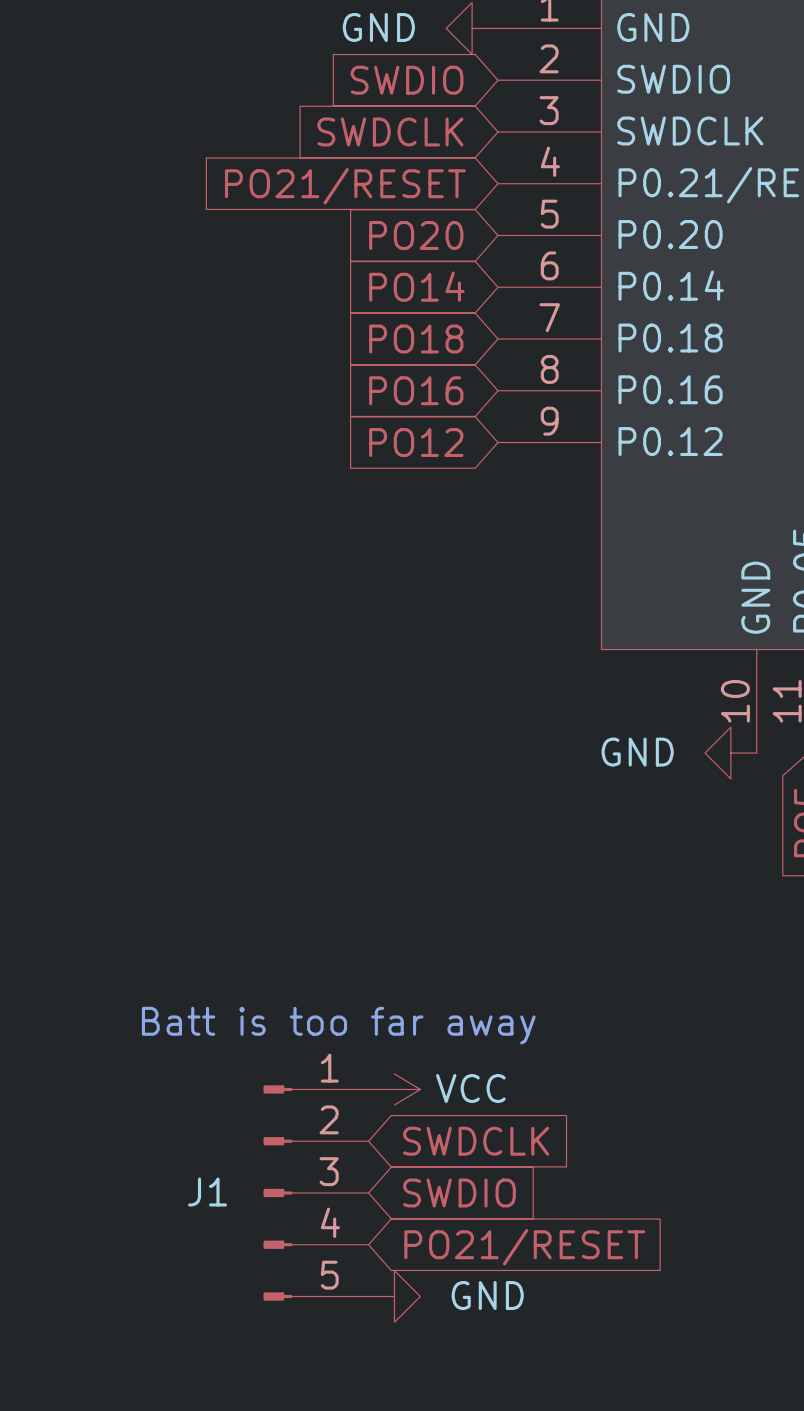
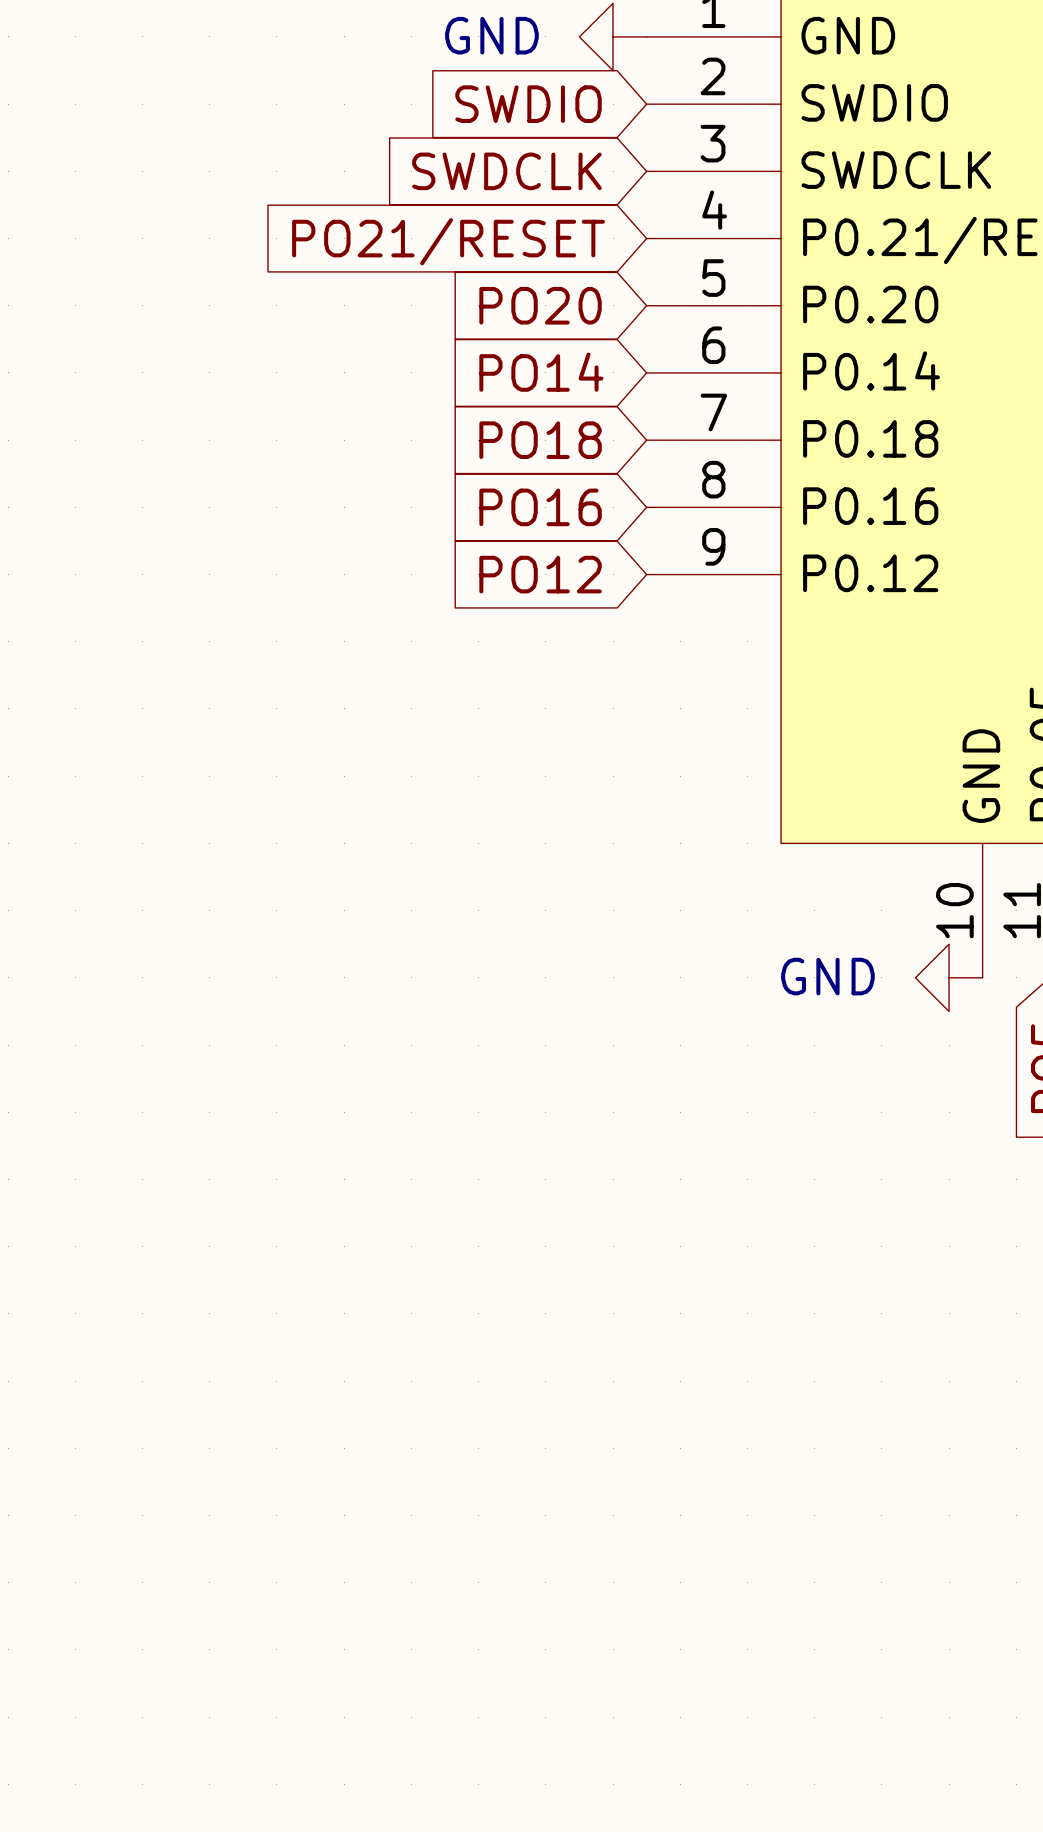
text: Batt is too far away (338, 1025) -> none
power symbol: VCC (394, 1089) -> none
global label: SWDCLK (476, 1141) -> none
J1: (316, 1192) -> none
global label: SWDIO (459, 1192) -> none
global label: PO21/RESET (524, 1247) -> none
power symbol: GND (394, 1296) -> none

